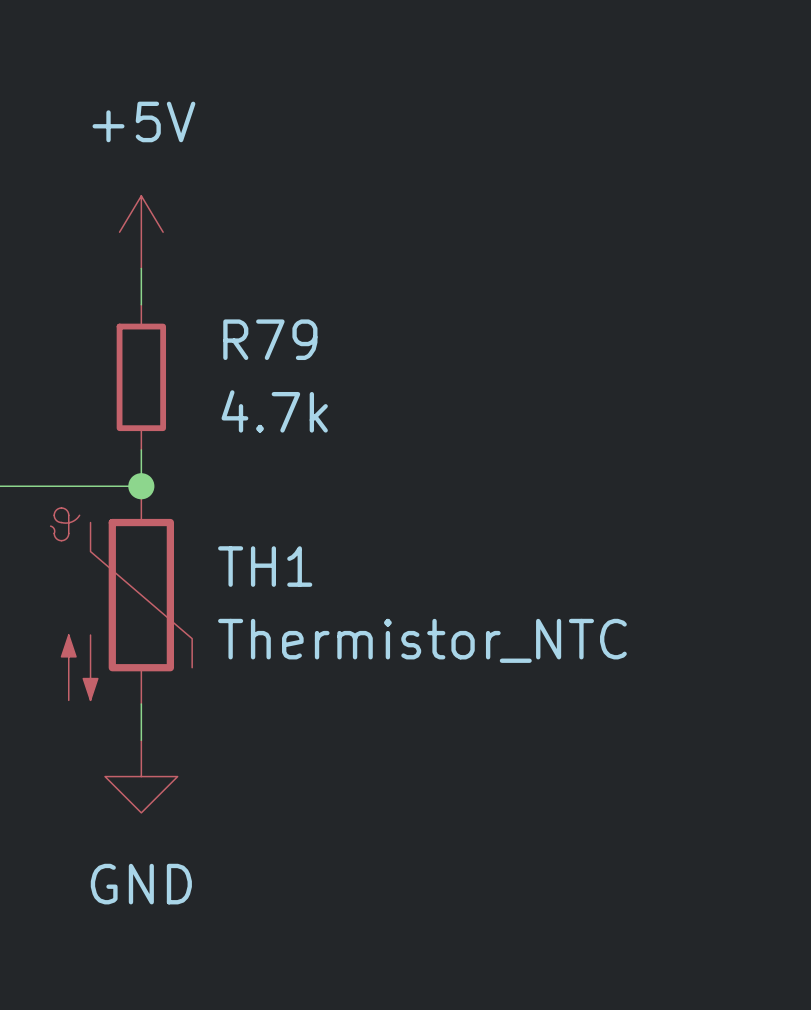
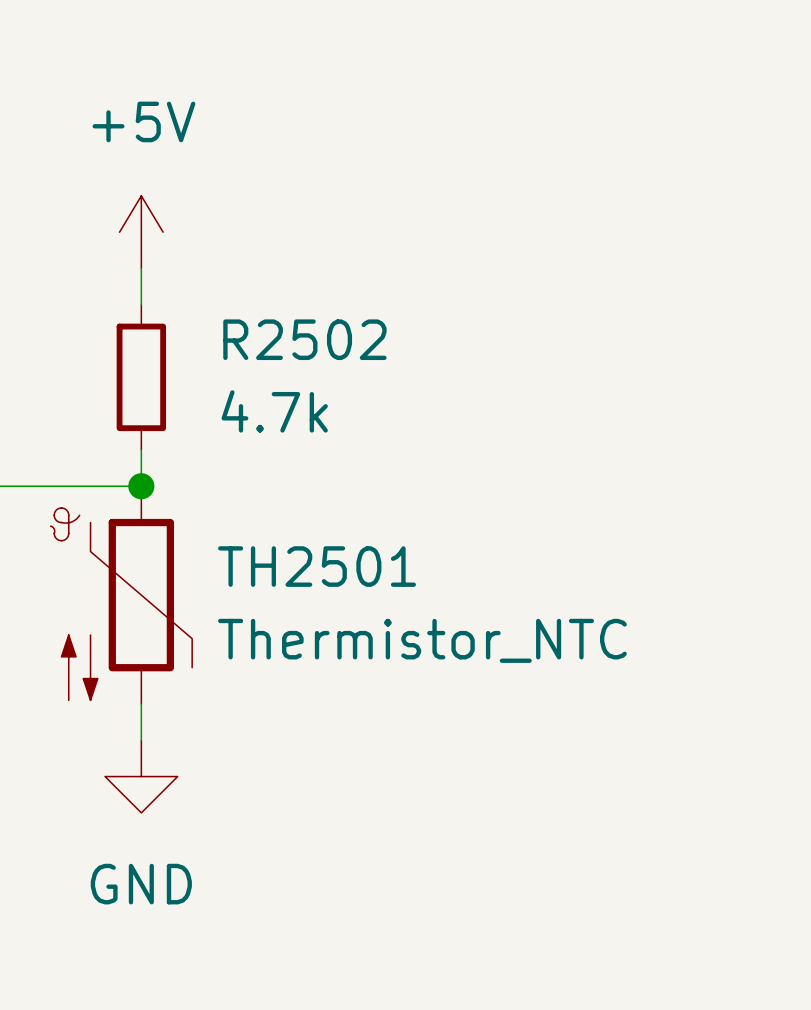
R79 name: R79 (270, 339) -> R2502 (304, 339)
TH1 name: TH1 (265, 566) -> TH2501 (317, 566)

